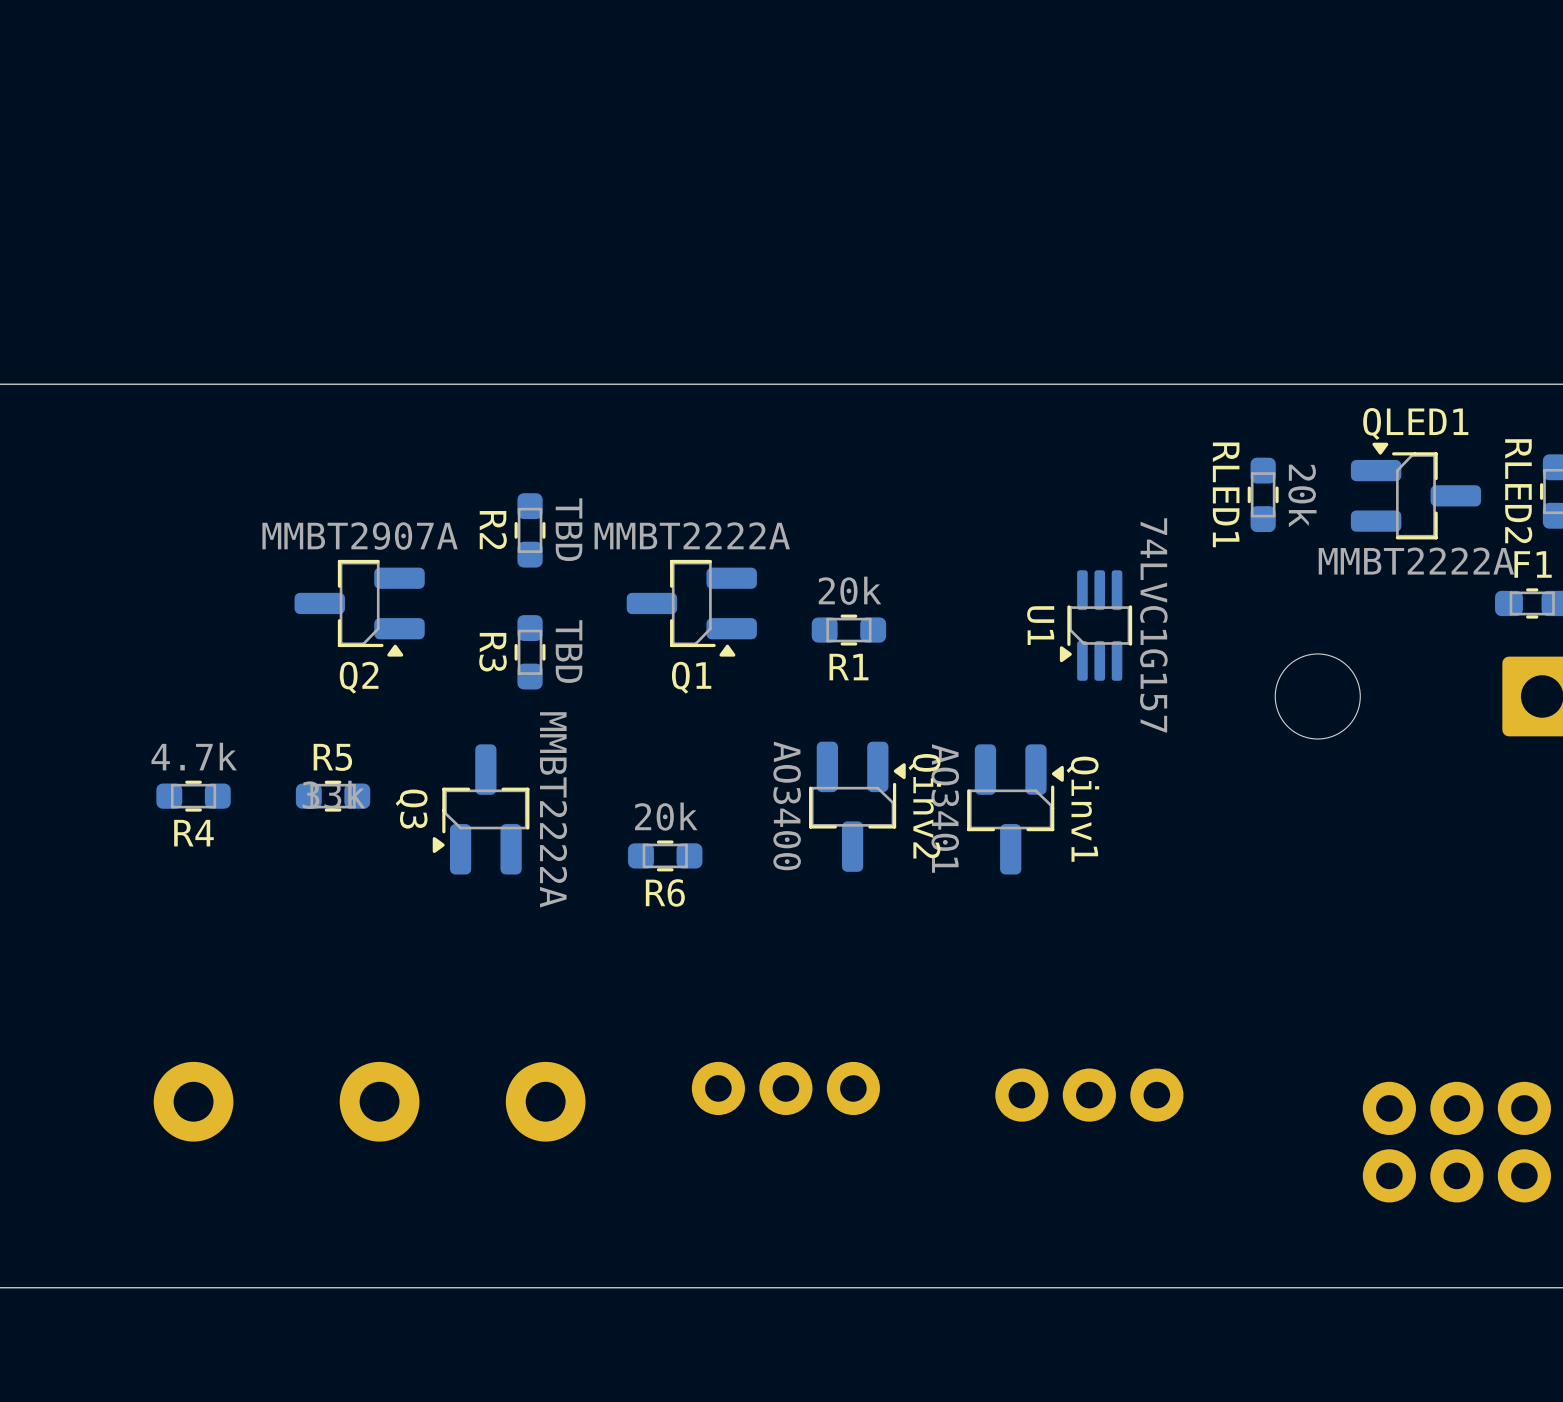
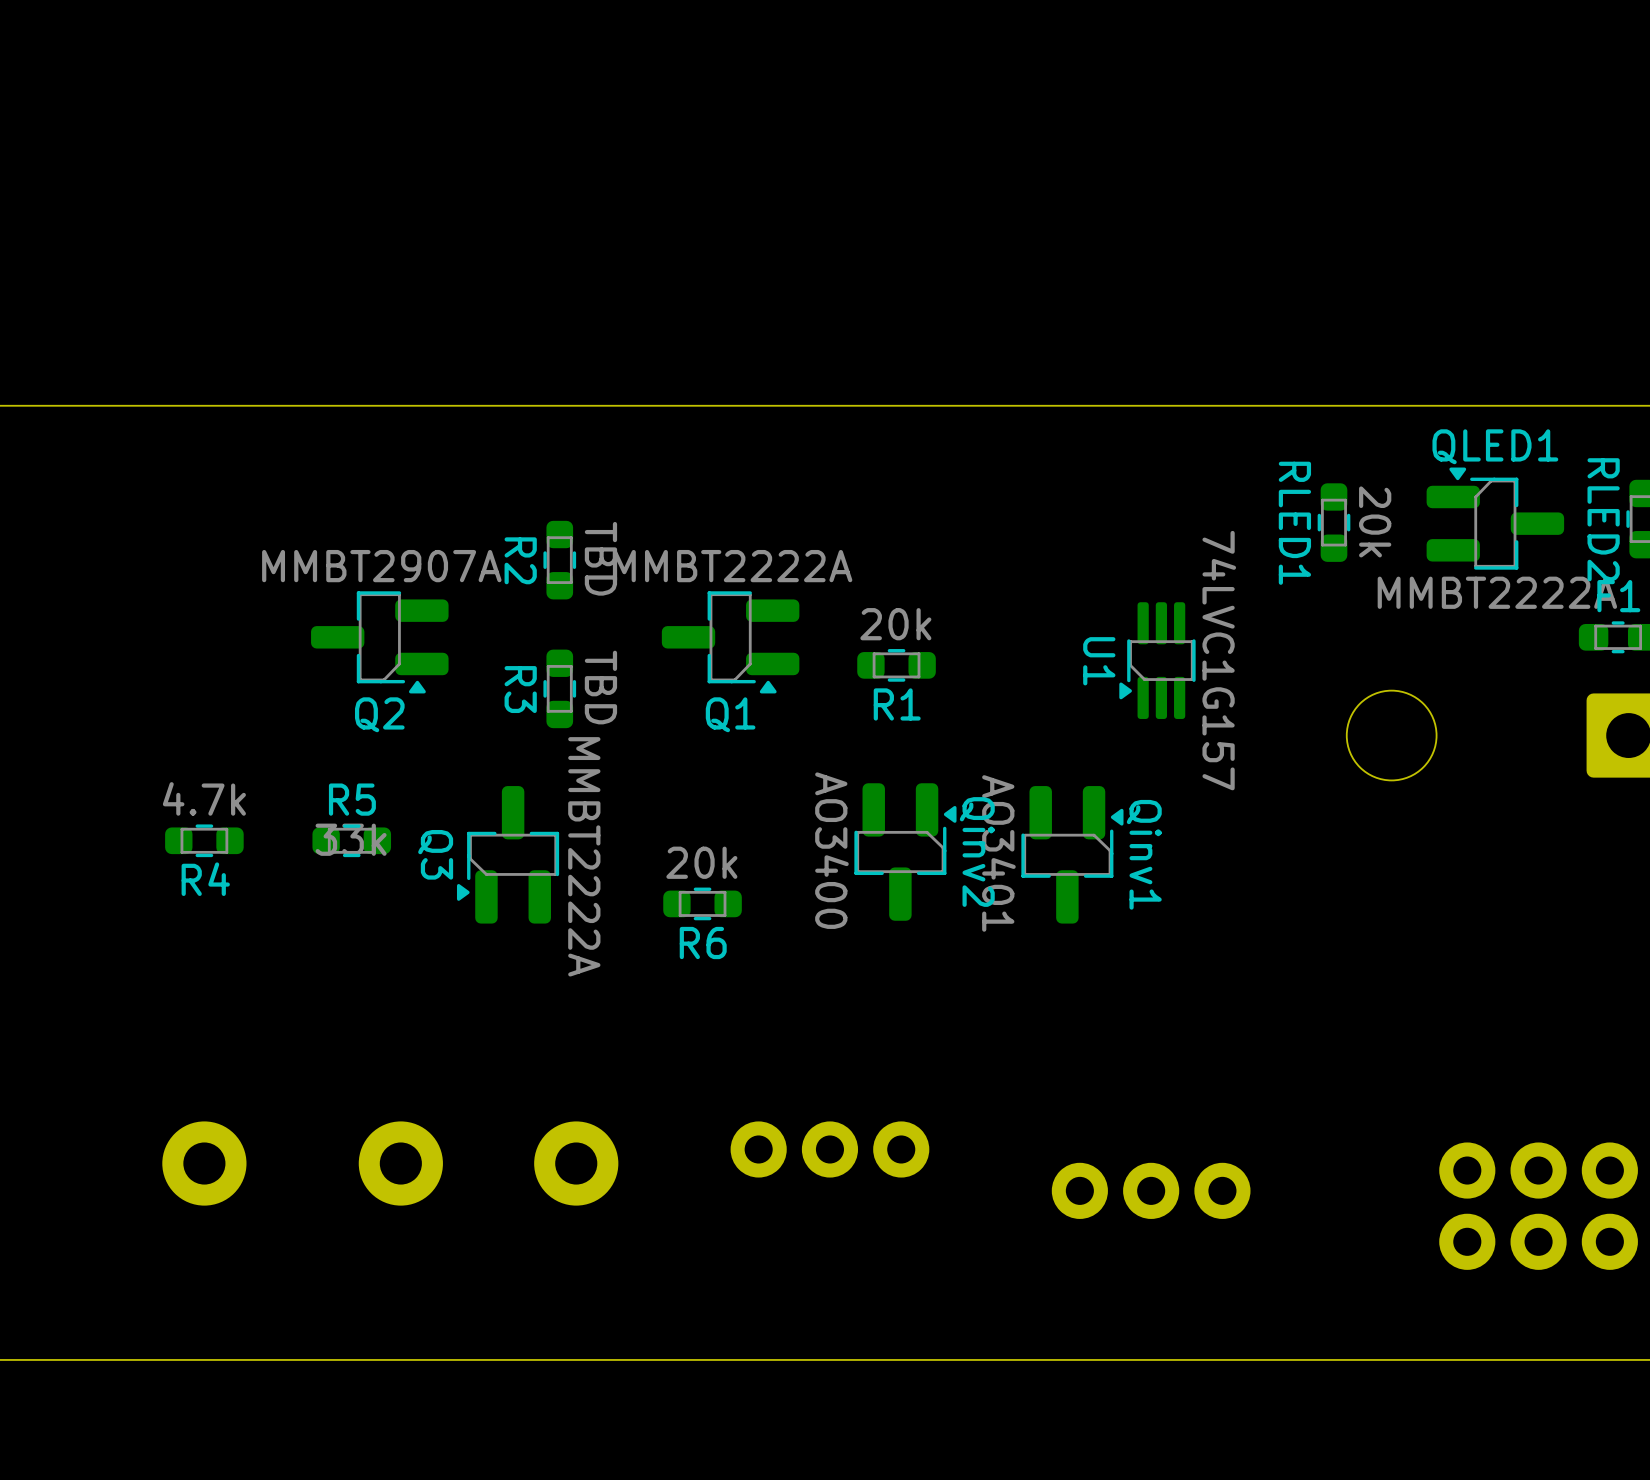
part position: (1089, 1095) -> (1151, 1190)

